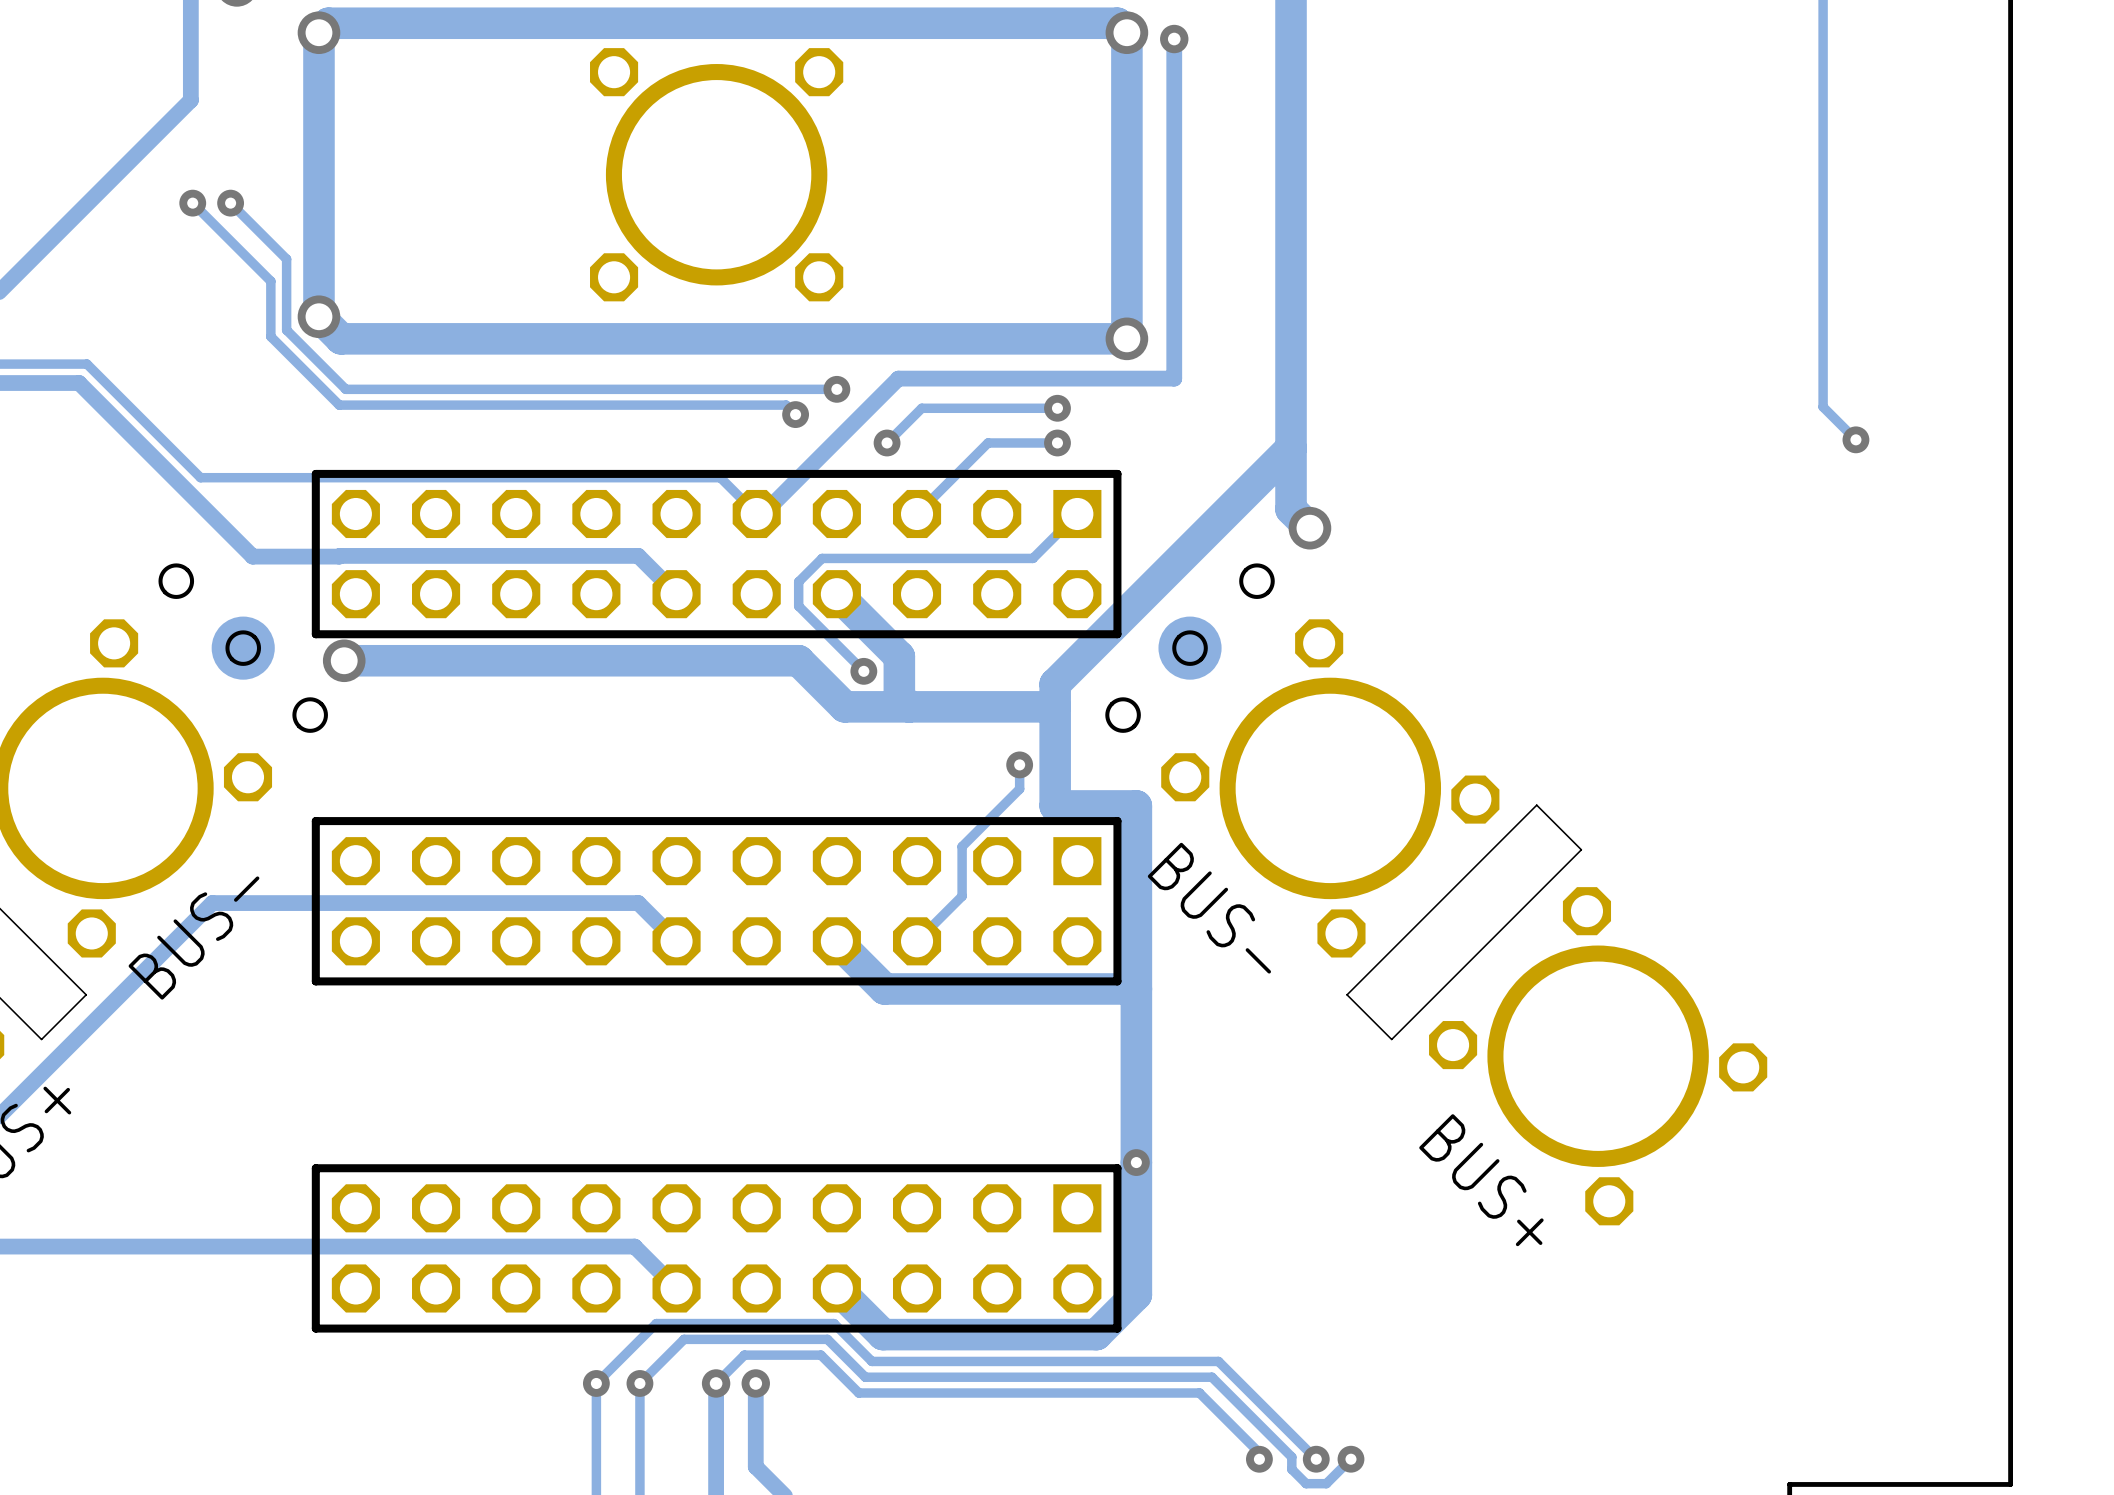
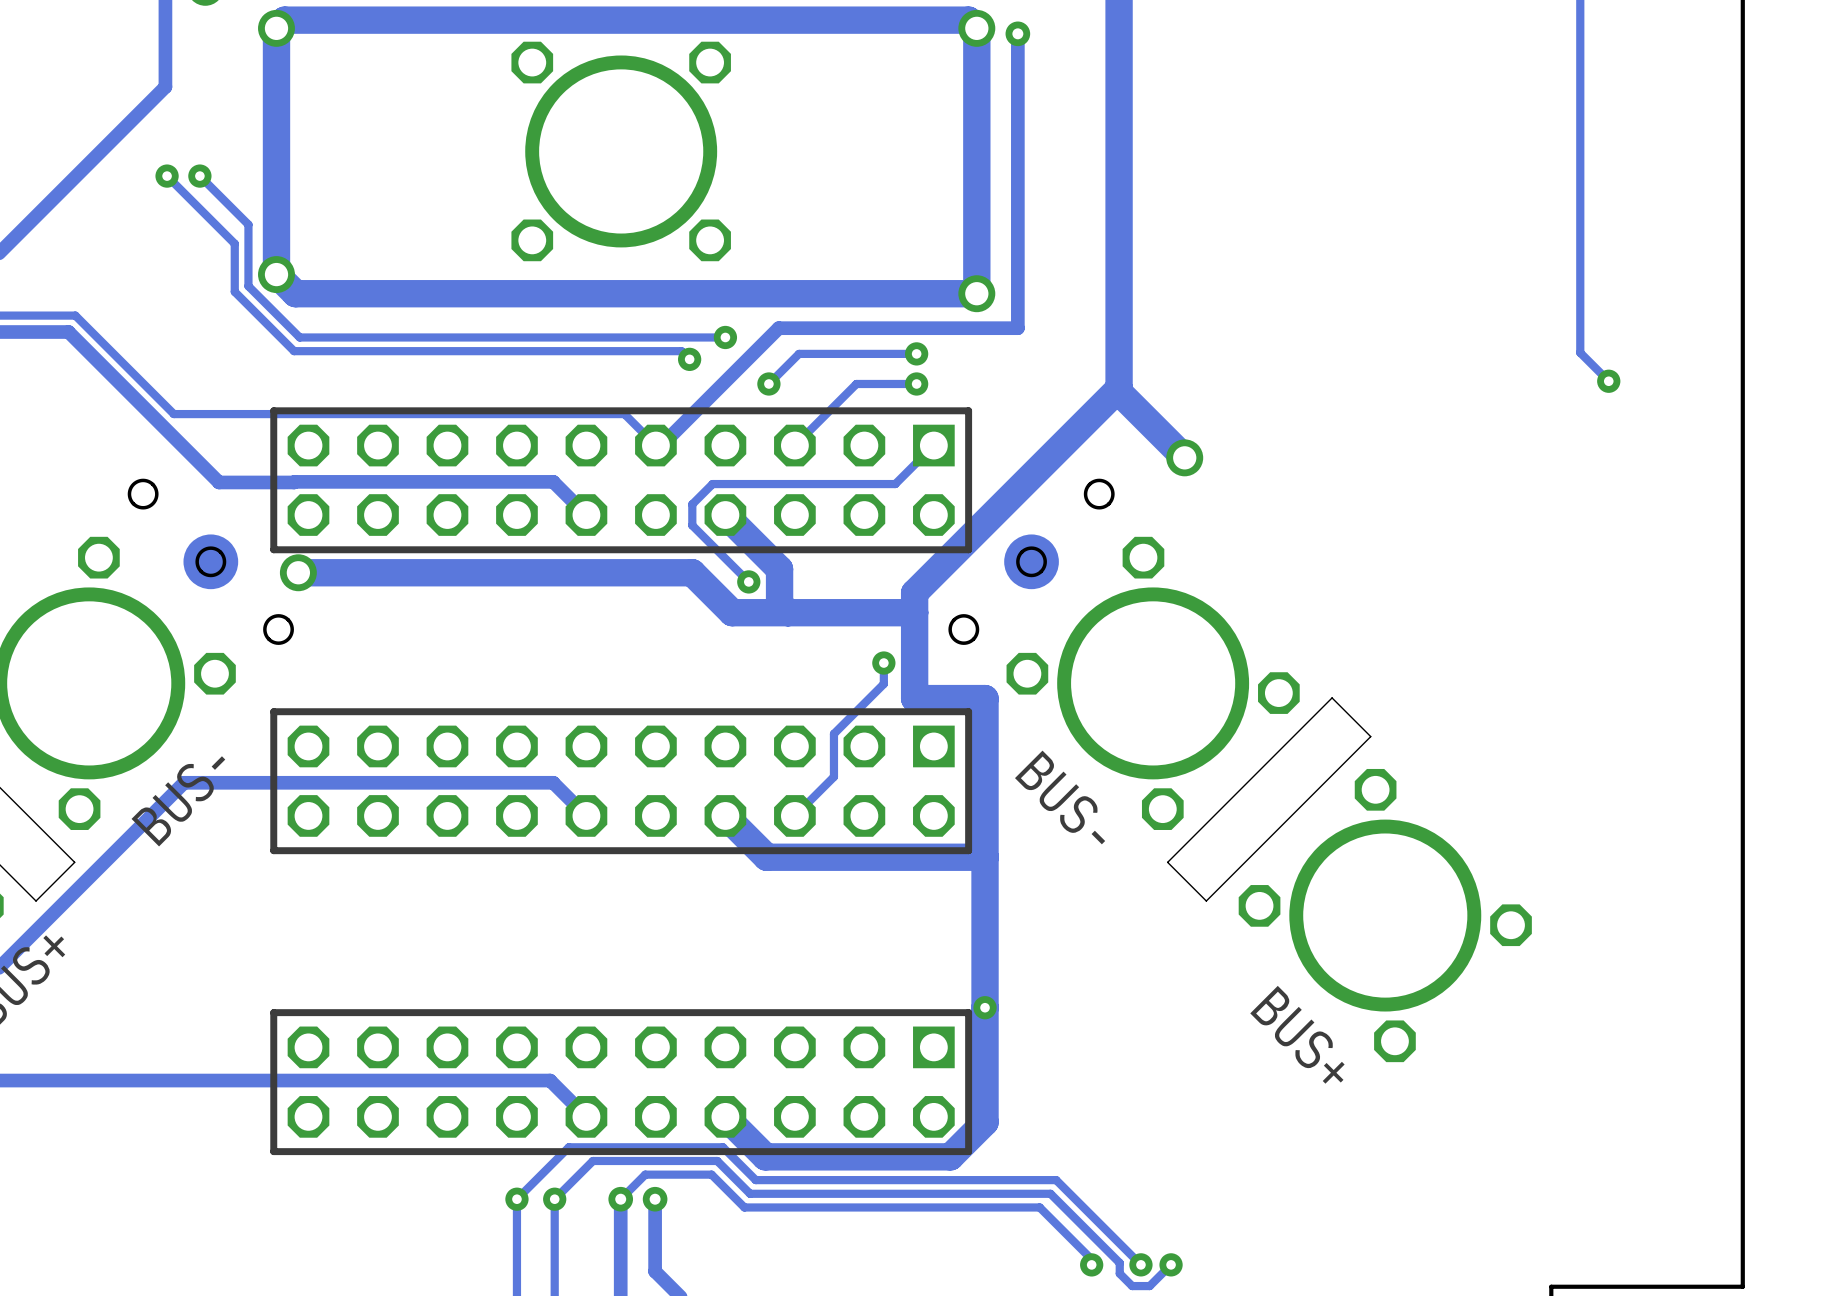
track: (1291, 452) (1291, 509) (1309, 528) -> (1119, 392) (1184, 457)
via position: (1309, 528) -> (1184, 457)
part footprint: [158, 563, 328, 733] -> [127, 478, 294, 645]
part footprint: [1105, 563, 1275, 733] -> [948, 478, 1115, 645]

